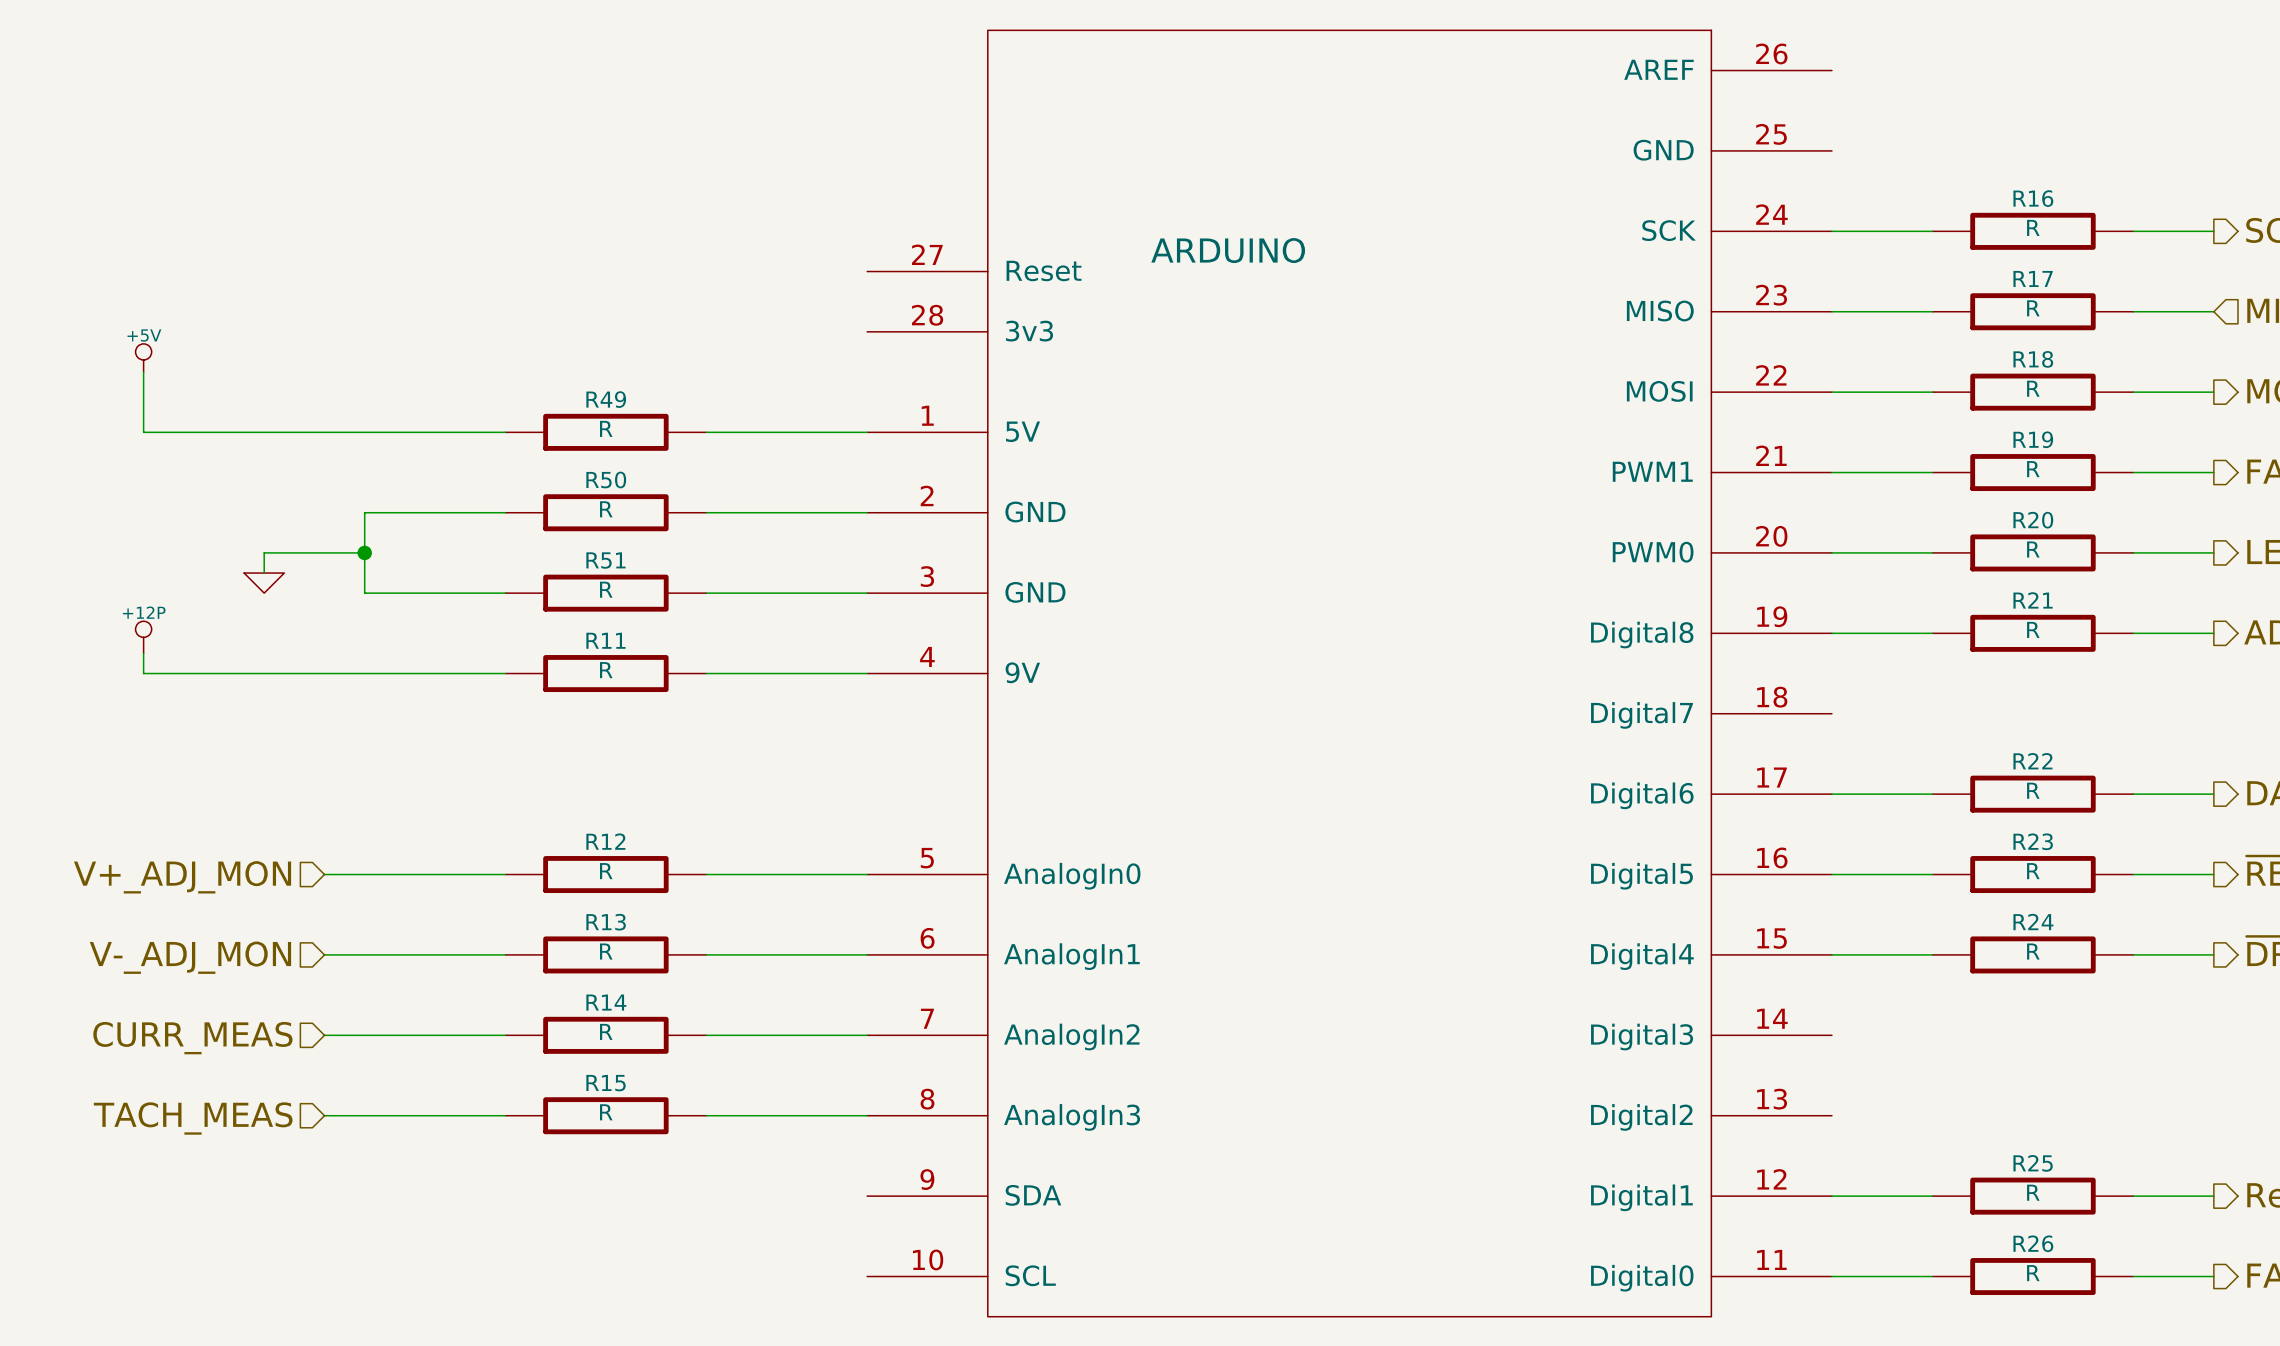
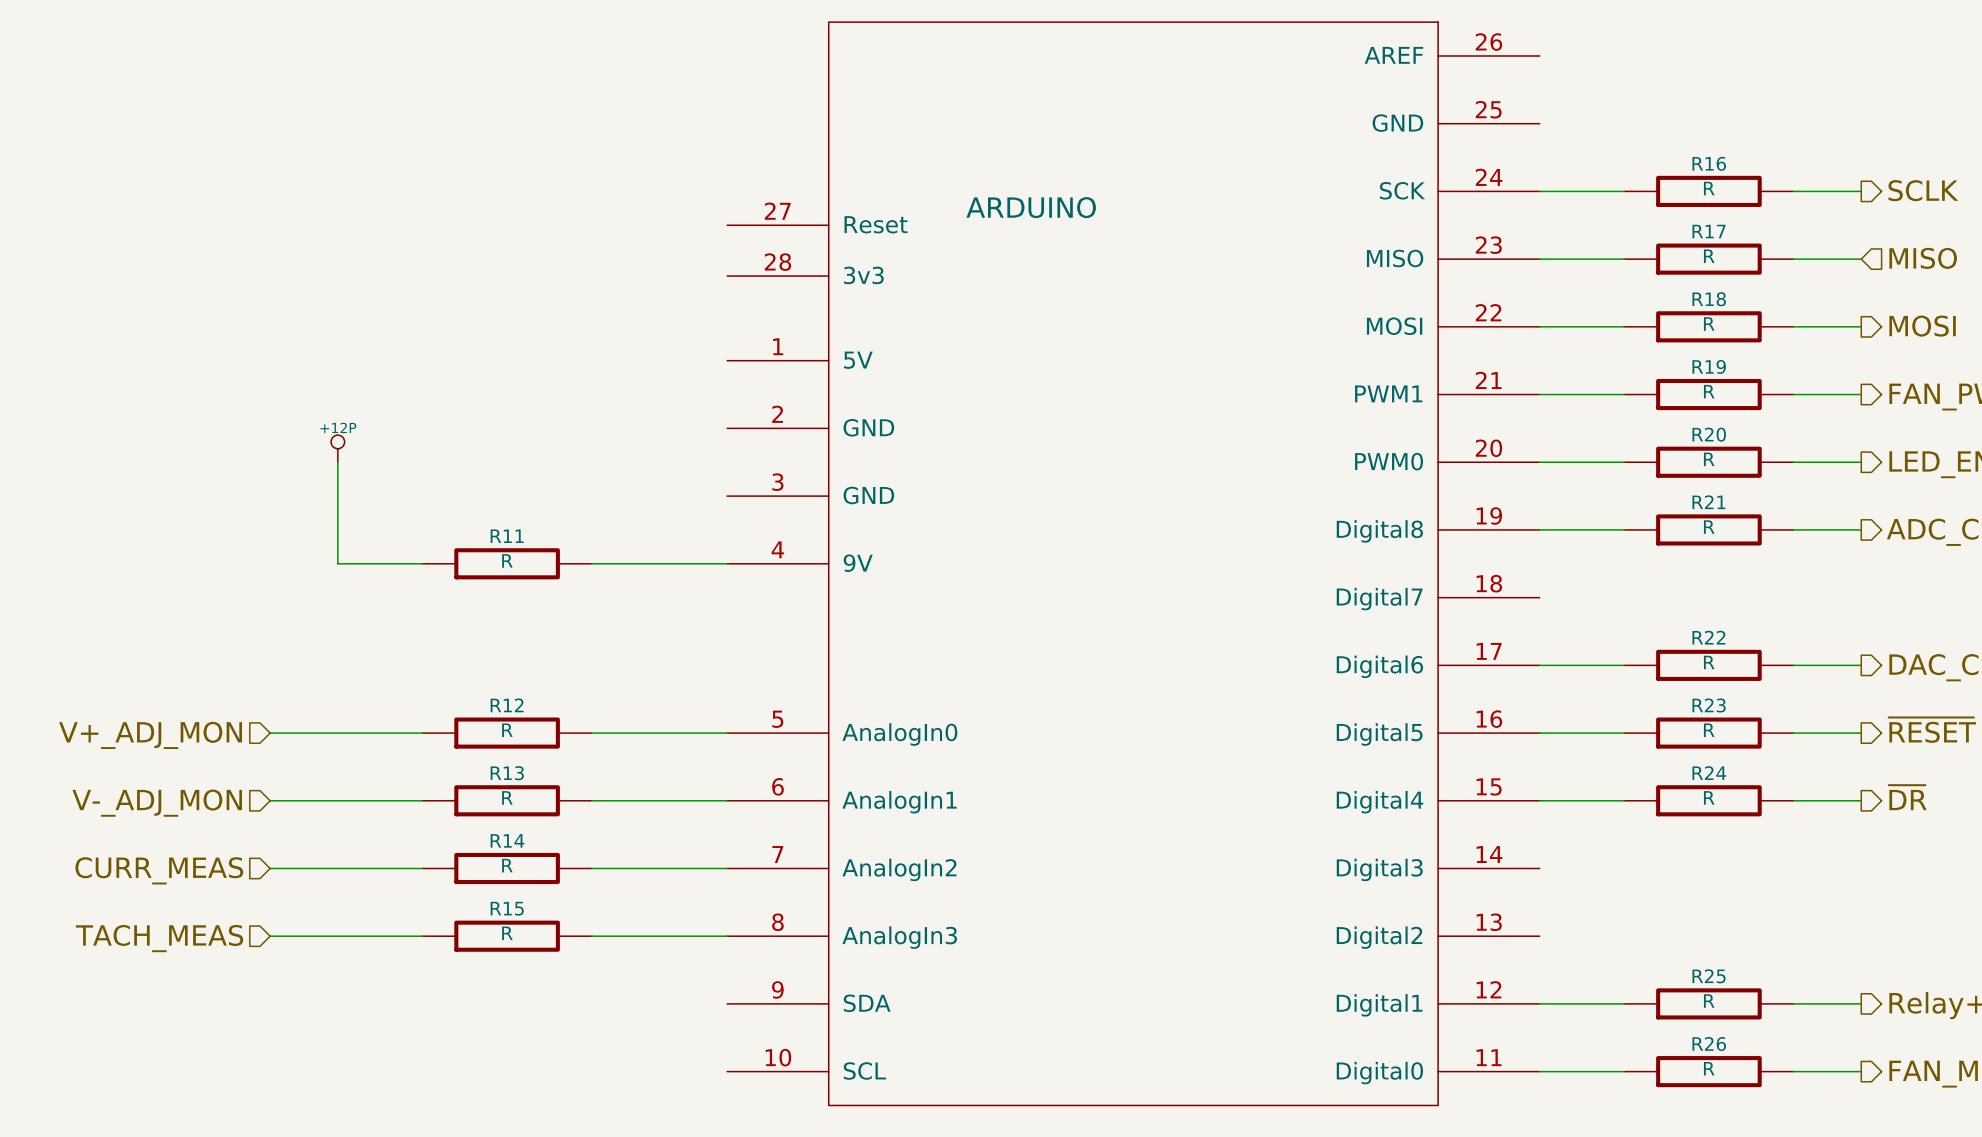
power symbol: +5V (143, 357) -> none
wire: (143, 372) (143, 432) (505, 432) -> none
R49: R (605, 432) -> none
wire: (706, 432) (867, 432) -> none
wire: (505, 512) (364, 512) (364, 593) (505, 593) -> none
R50: R (605, 512) -> none
wire: (706, 512) (867, 512) -> none
wire: (364, 552) (264, 552) (264, 573) -> none
junction: (364, 552) -> none
power symbol: (264, 583) -> none
R51: R (605, 593) -> none
wire: (706, 593) (867, 593) -> none
power symbol position: +12P (143, 637) -> +12P (337, 448)
wire: (143, 653) (143, 673) (404, 673) -> (337, 462) (337, 563)

